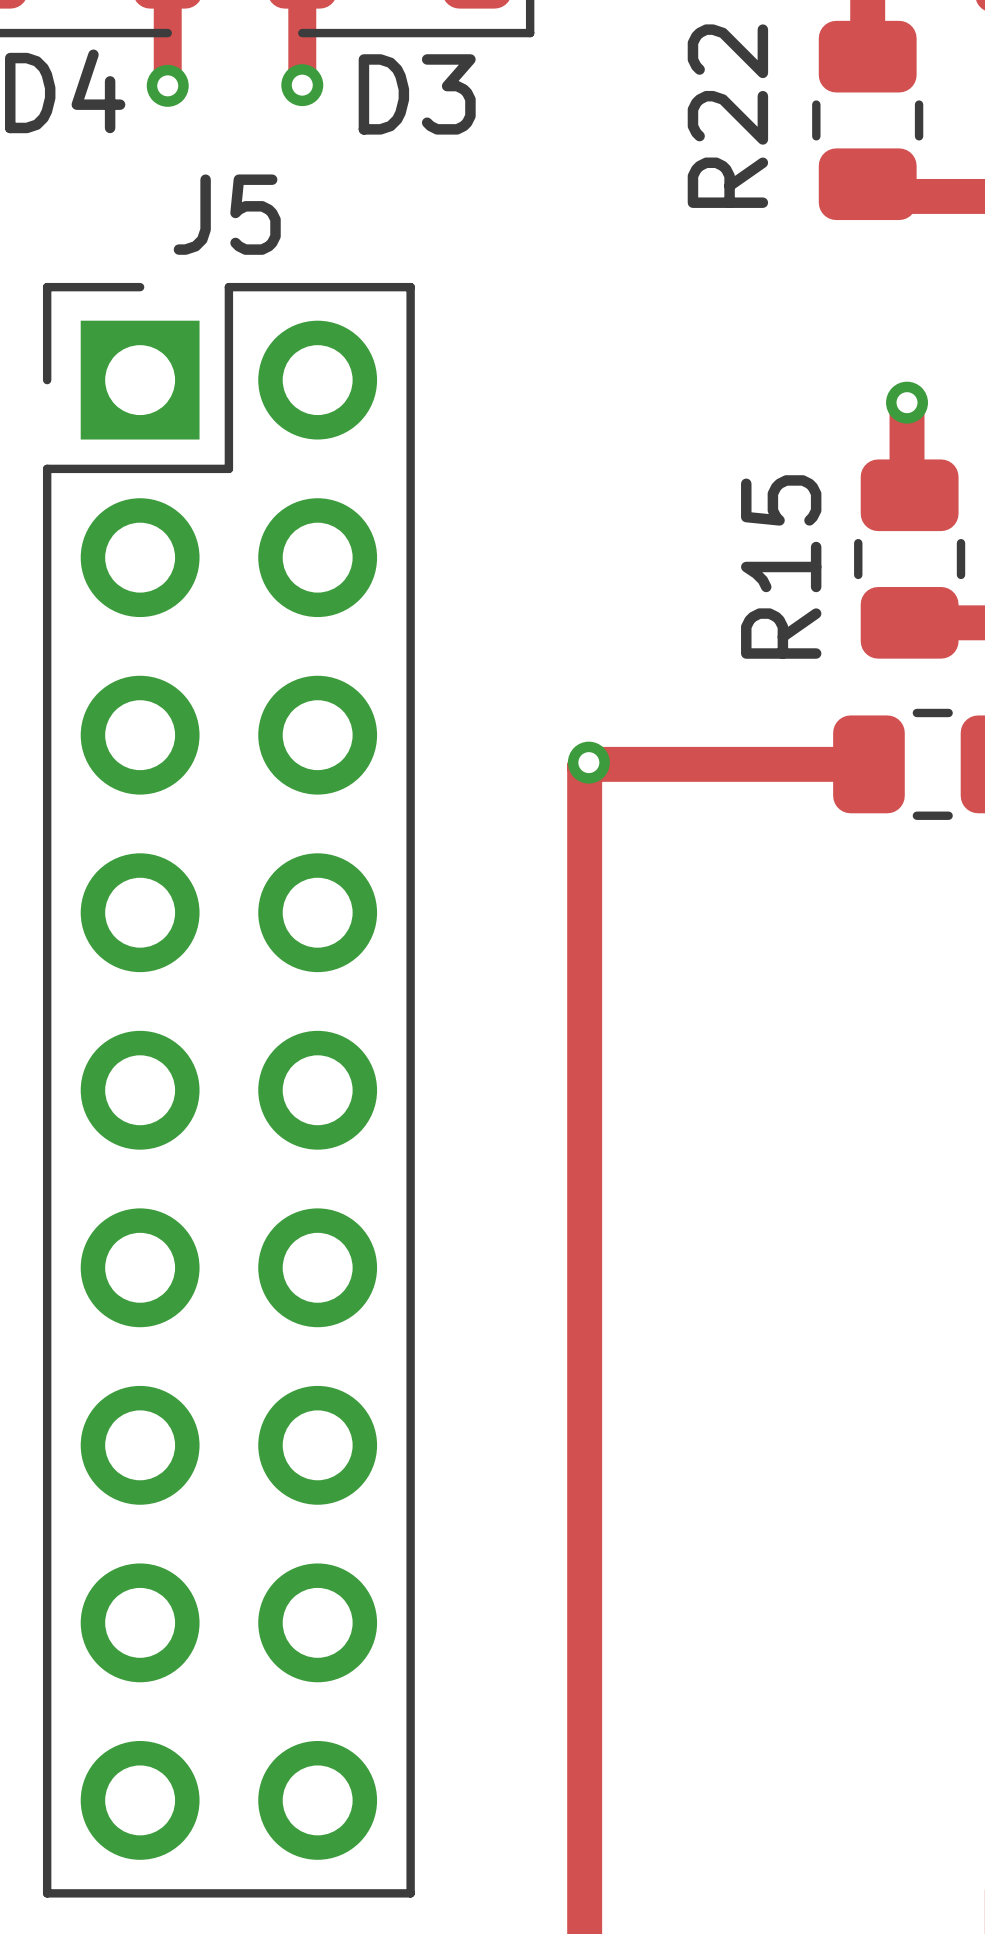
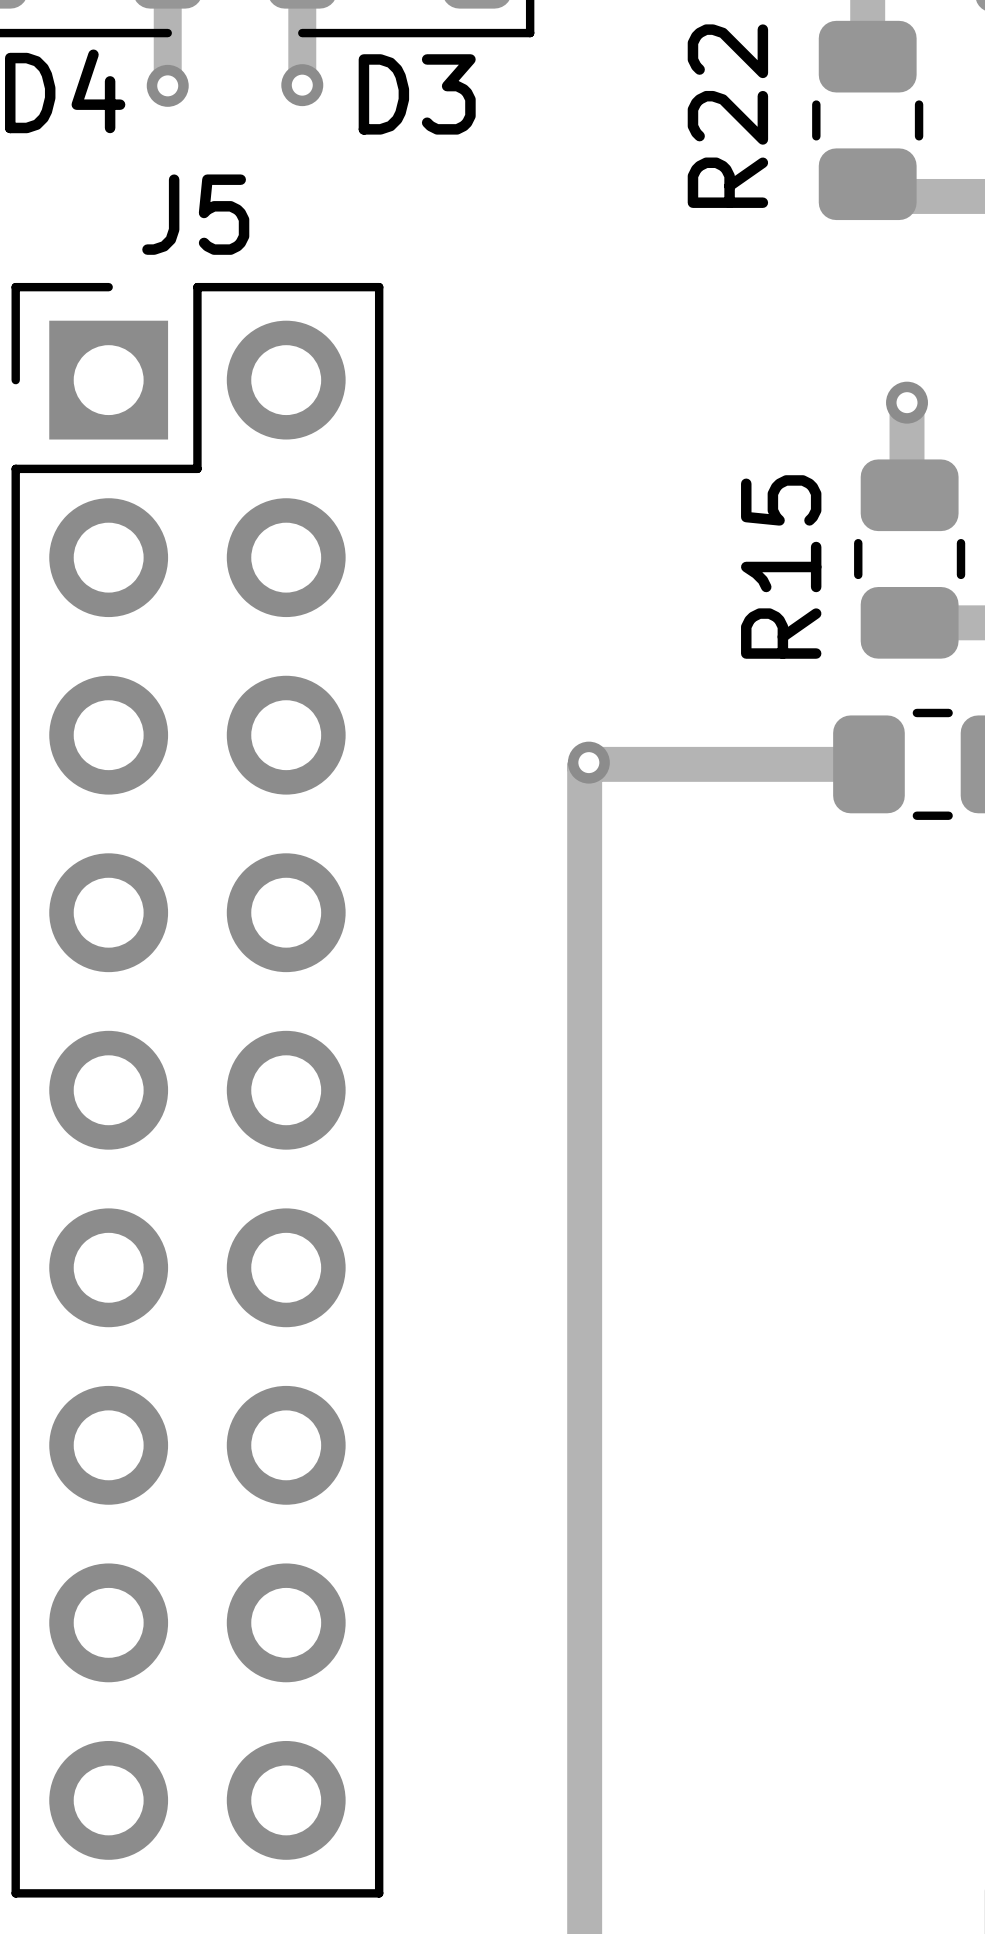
J5 position: (228, 1090) -> (197, 1090)

